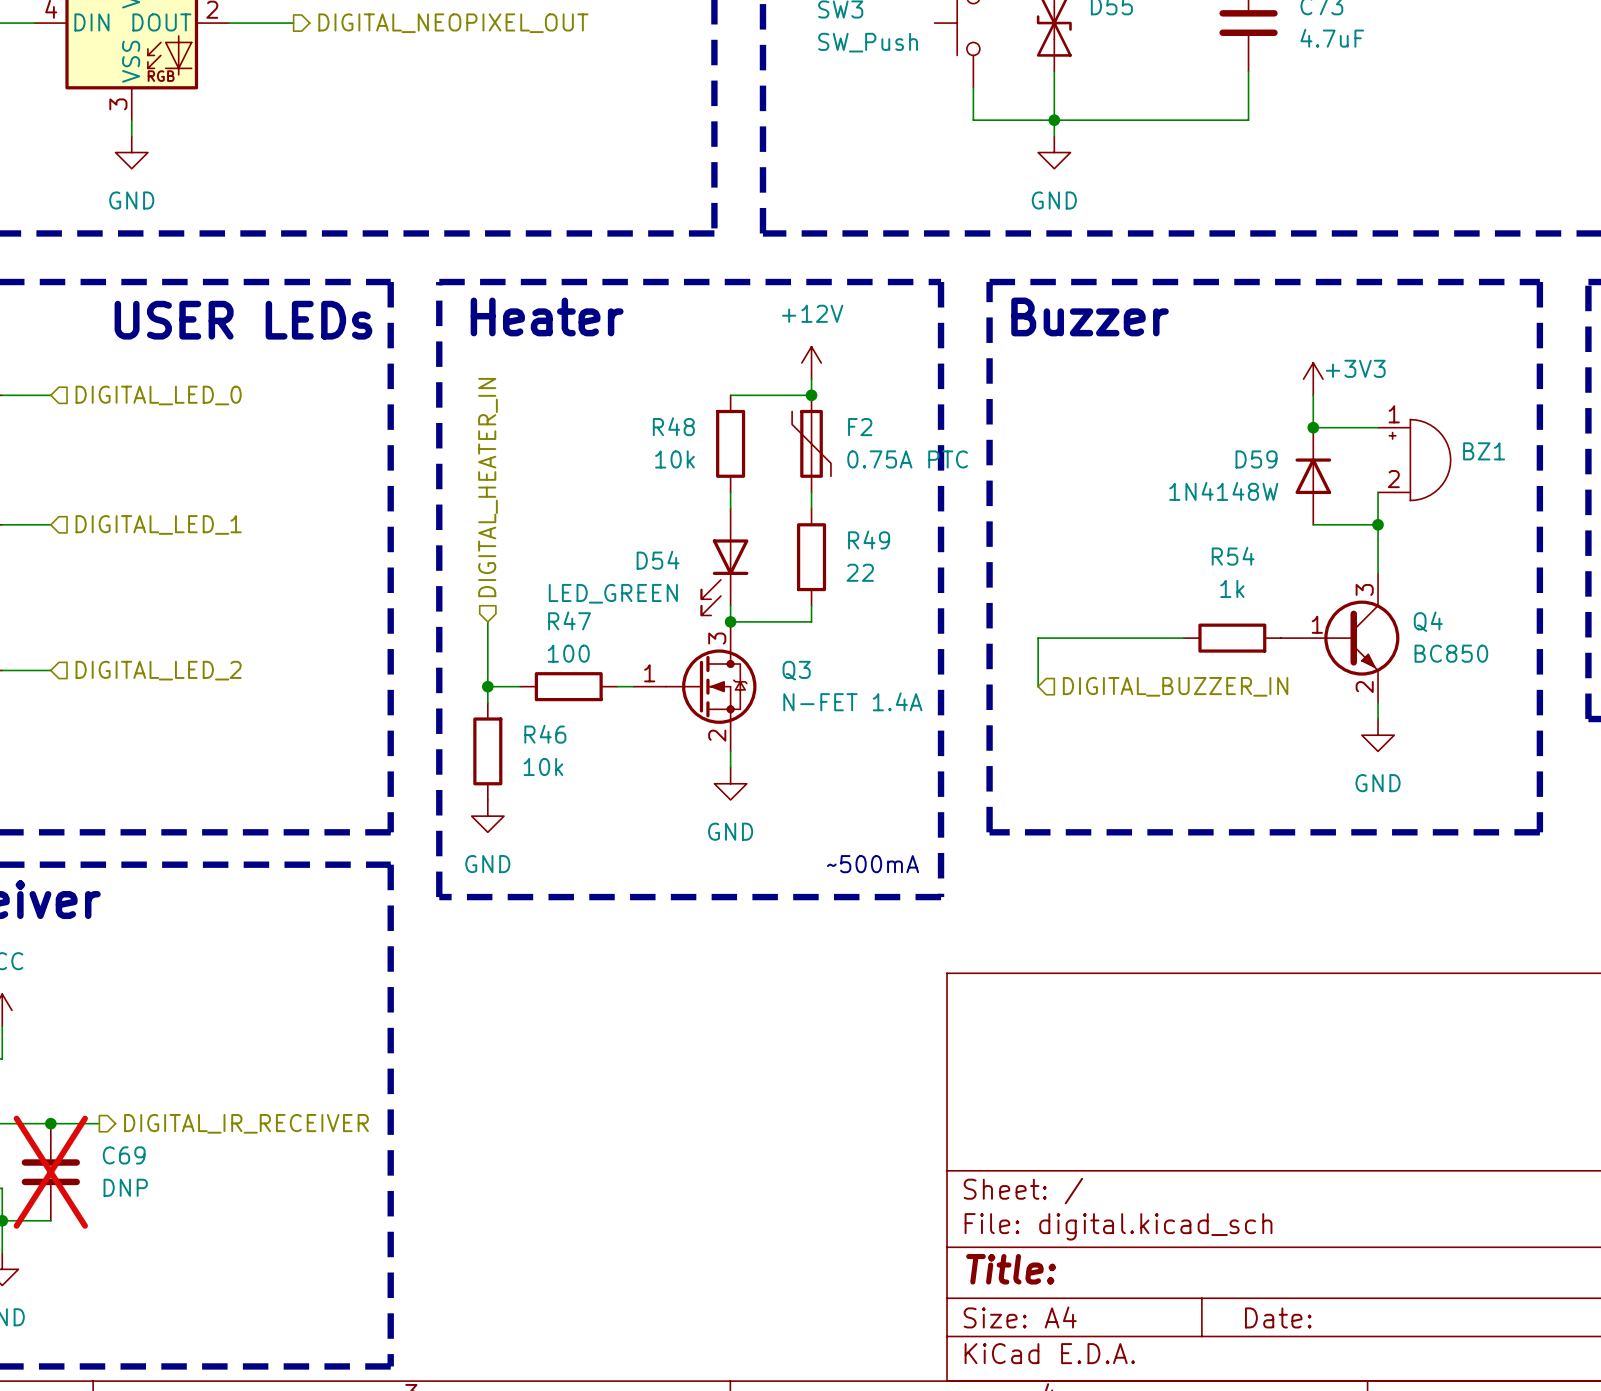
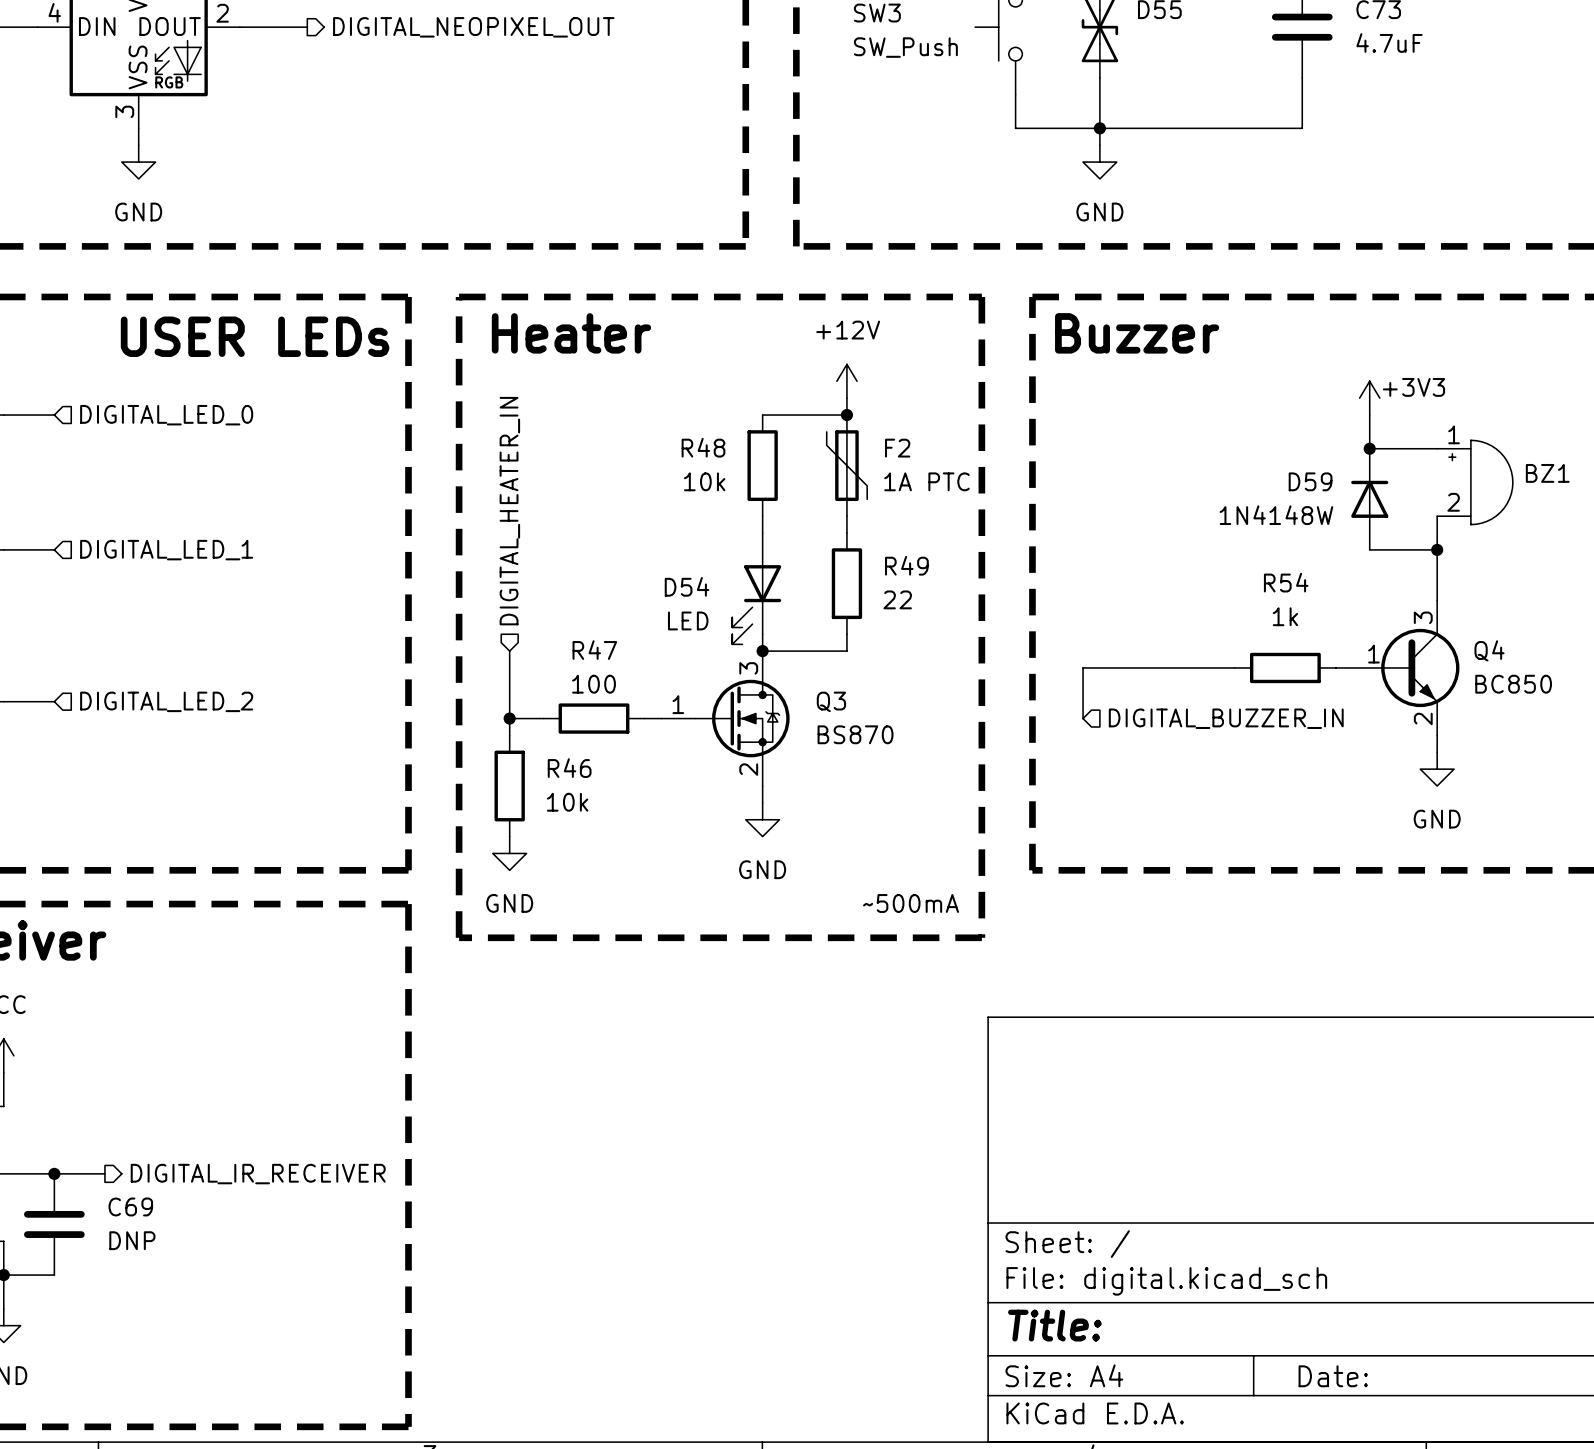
F2 value: 0.75A PTC (907, 459) -> 1A PTC (926, 481)
D54 value: LED_GREEN (613, 593) -> LED (688, 620)
Q3 value: N-FET 1.4A (852, 701) -> BS870 (855, 734)
C69 do-not-place cross: (50, 1172) -> none

